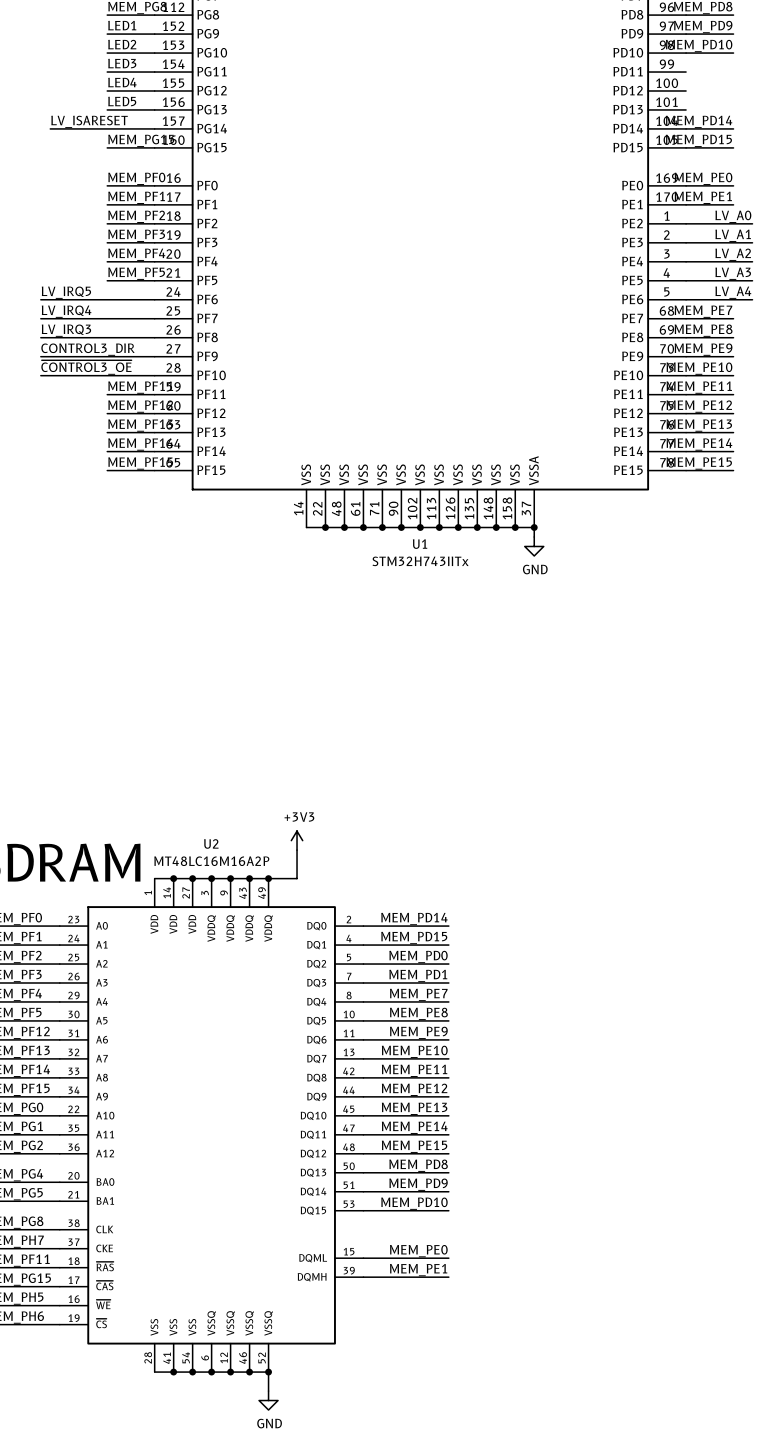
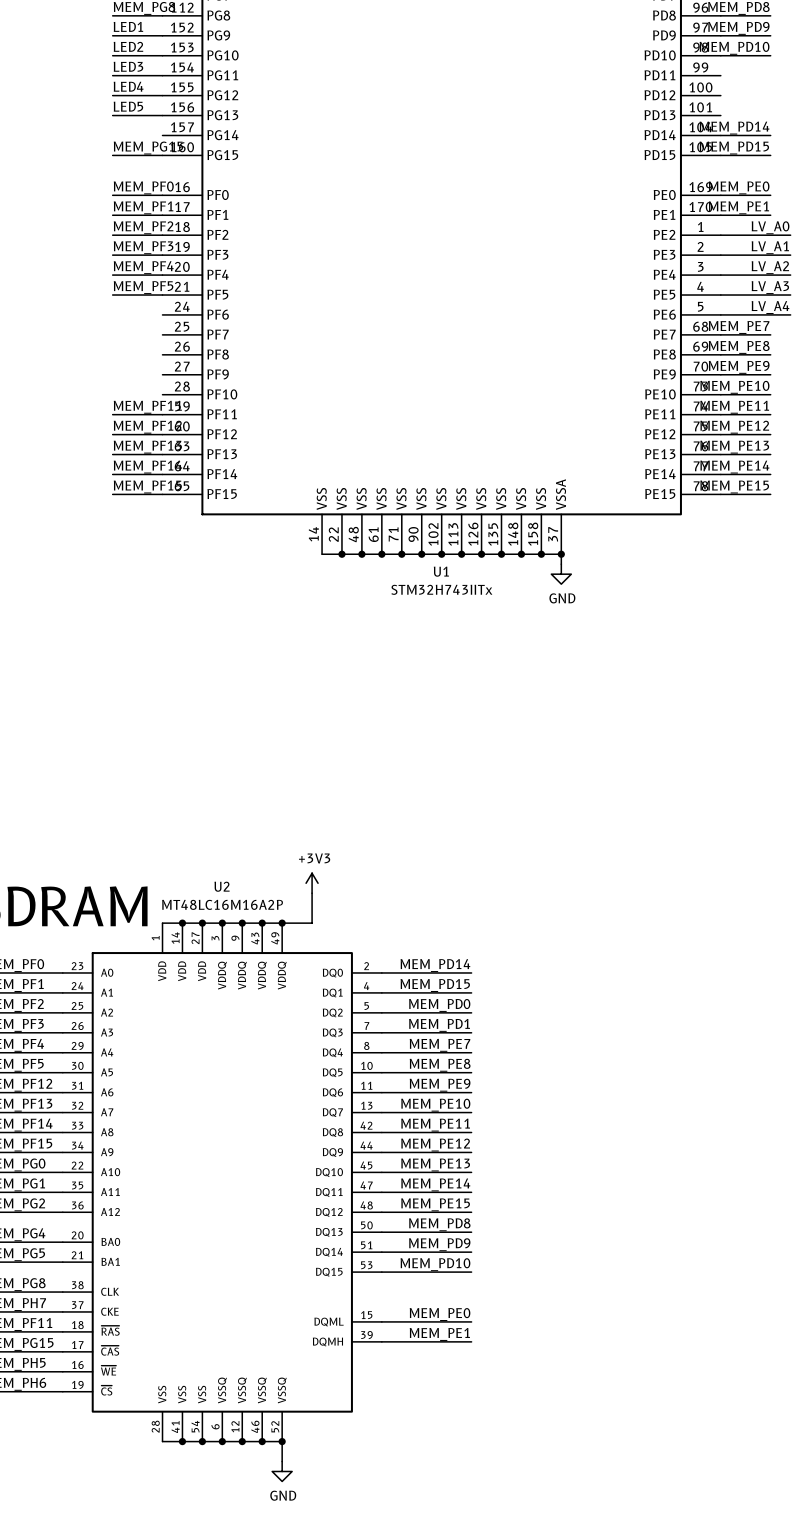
label: LV_ISARESET (89, 121) -> none
wire: (50, 128) (154, 128) -> none
label: LV_IRQ5 (66, 292) -> none
wire: (40, 299) (154, 299) -> none
label: LV_IRQ4 (66, 311) -> none
wire: (40, 318) (154, 318) -> none
label: LV_IRQ3 (66, 330) -> none
wire: (40, 337) (154, 337) -> none
label: CONTROL3_DIR (88, 349) -> none
wire: (40, 356) (154, 356) -> none
label: ~{CONTROL3_OE} (86, 367) -> none
wire: (40, 375) (154, 375) -> none

